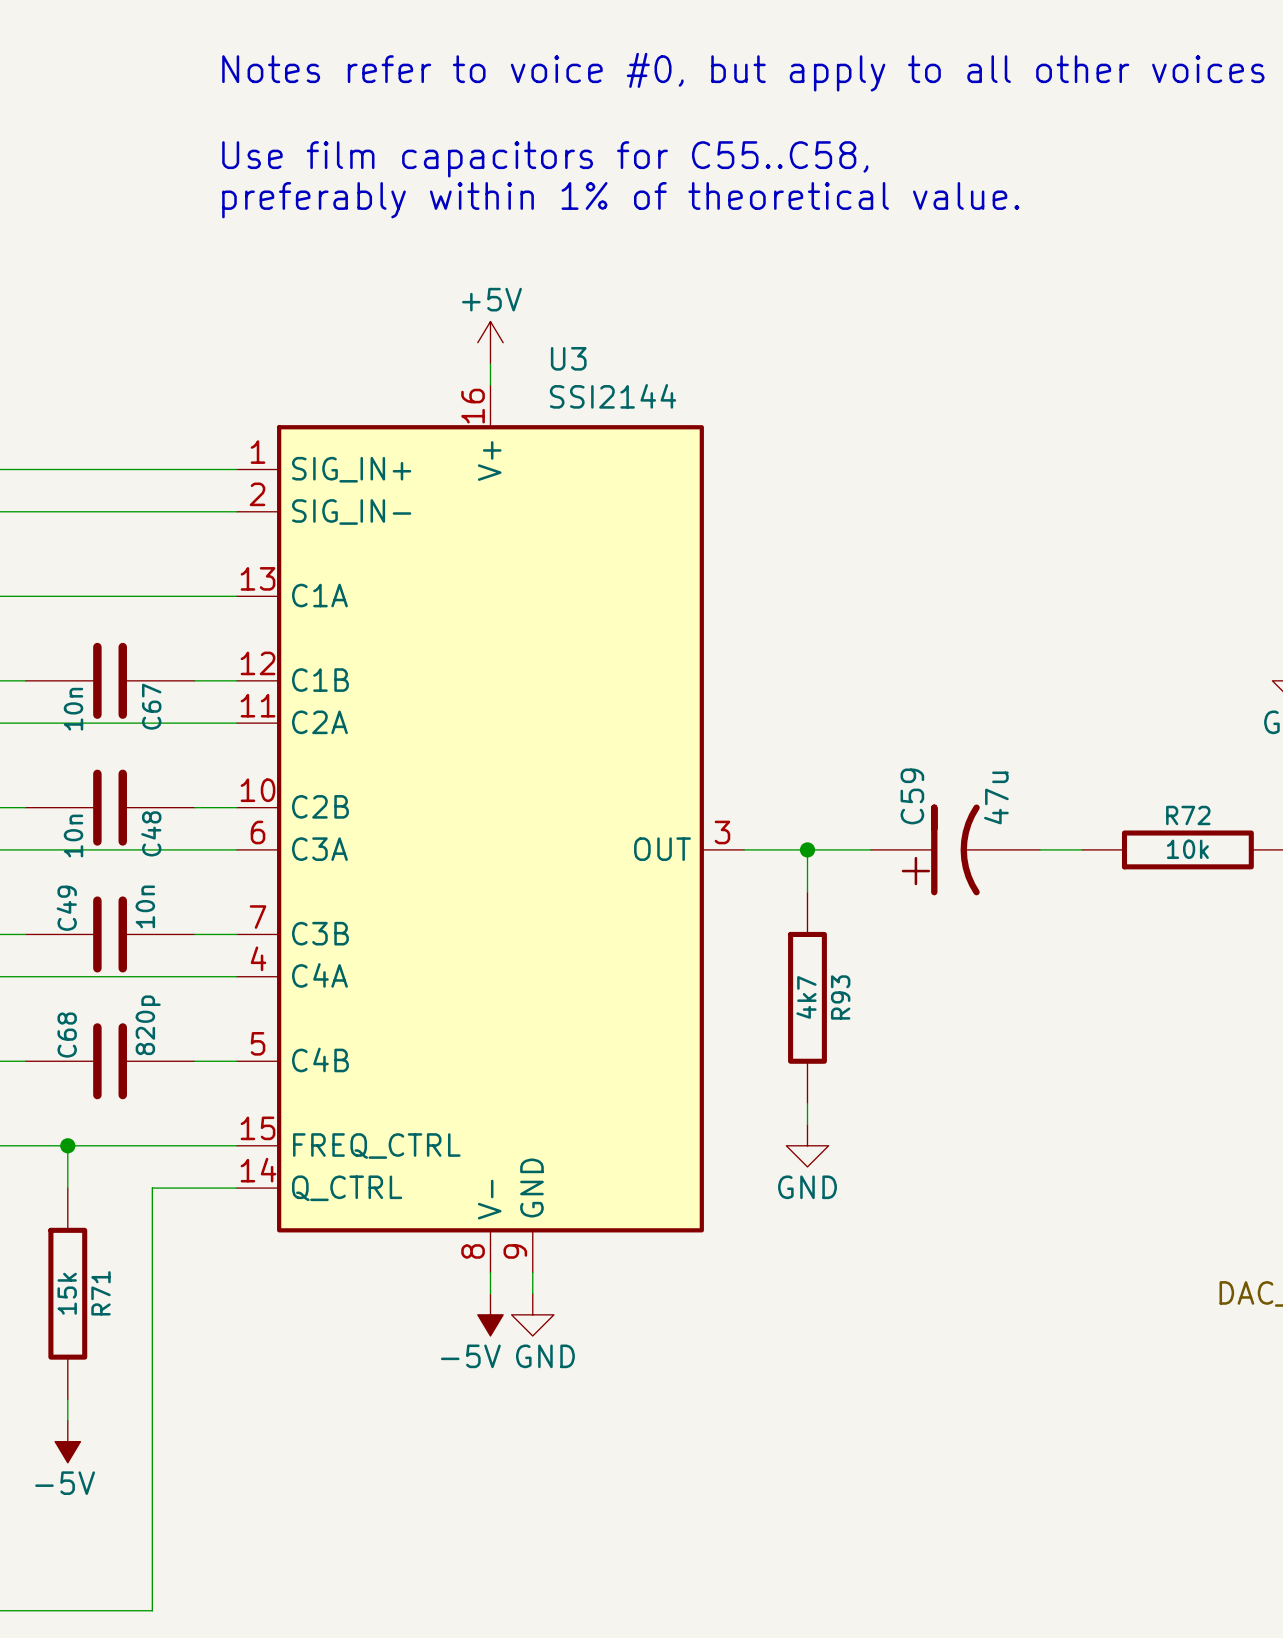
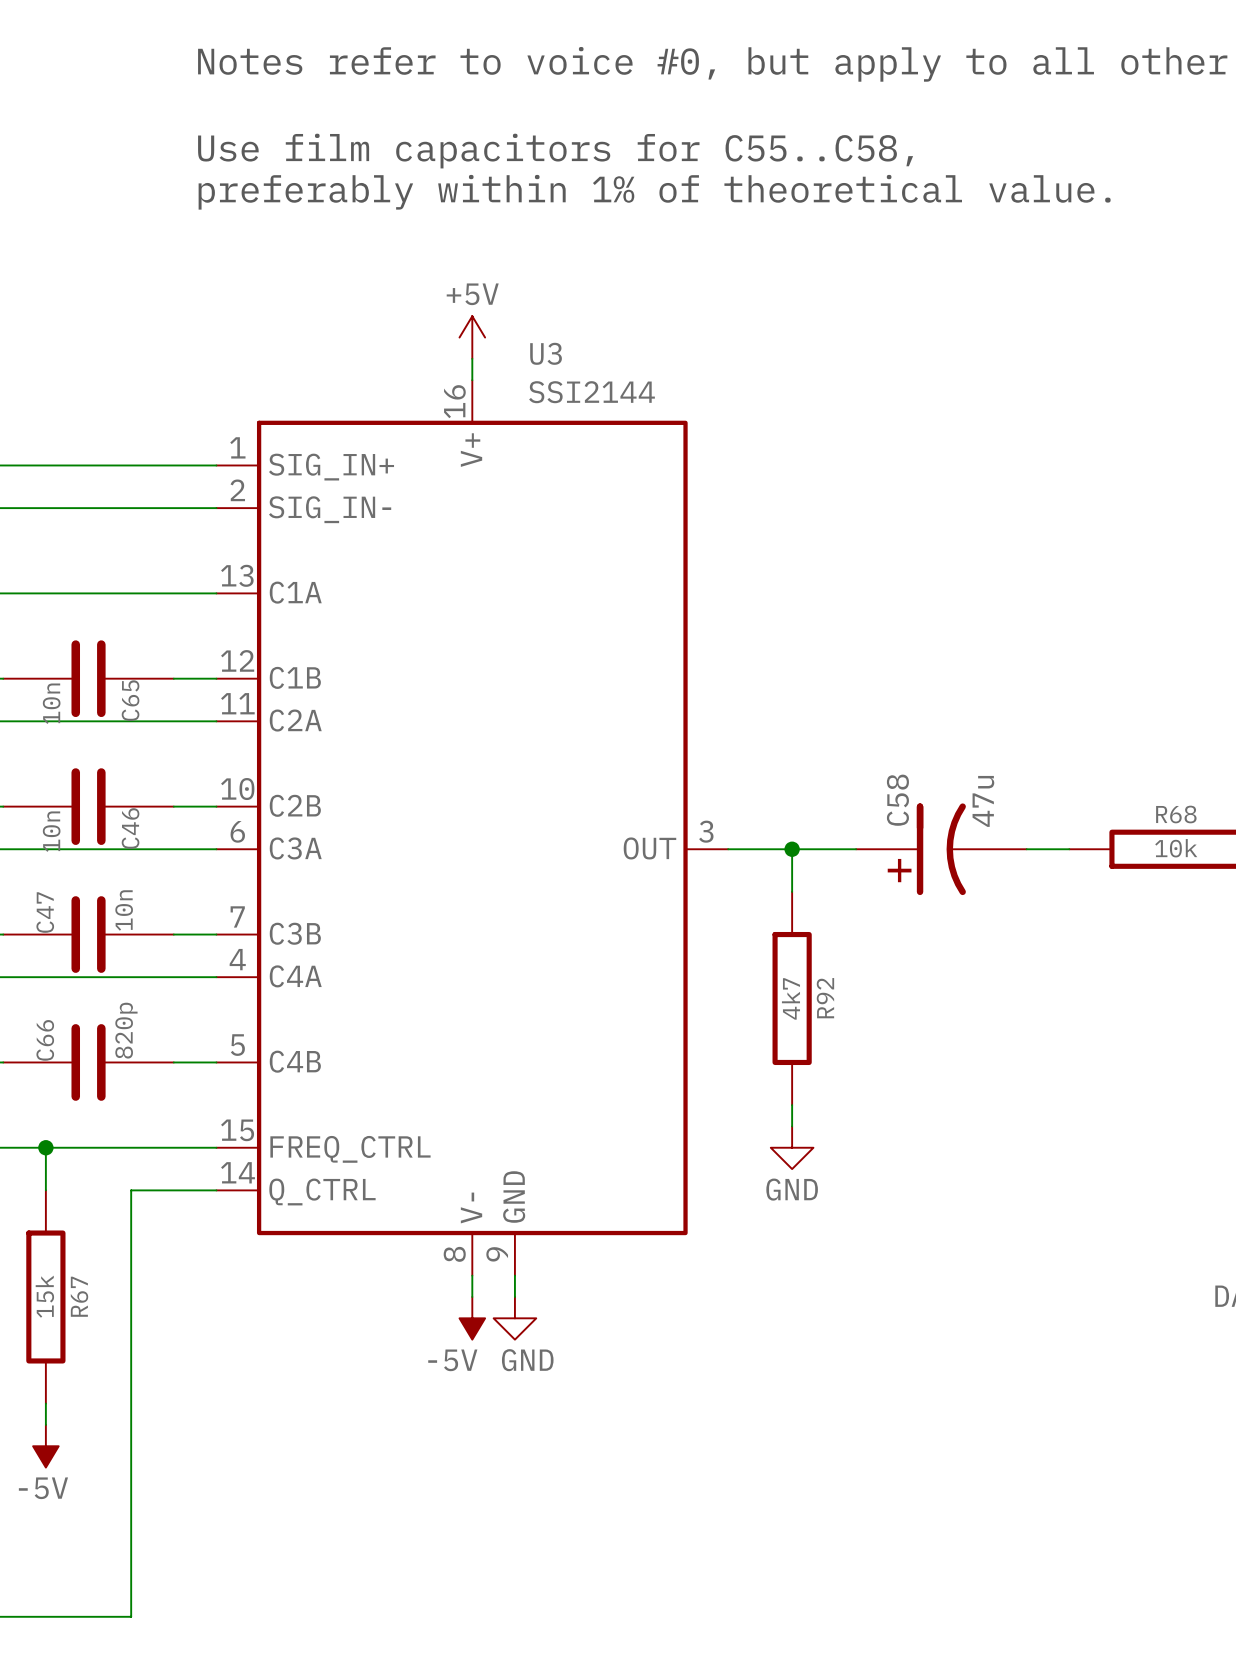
C67 name: C67 (151, 706) -> C65 (130, 700)
C59 name: C59 (912, 796) -> C58 (897, 800)
R72 name: R72 (1188, 815) -> R68 (1176, 814)
C48 name: C48 (151, 833) -> C46 (130, 828)
C49 name: C49 (66, 908) -> C47 (45, 912)
R93 name: R93 (840, 997) -> R92 (825, 998)
C68 name: C68 (67, 1035) -> C66 (45, 1040)
R71 name: R71 (100, 1293) -> R67 (79, 1296)

